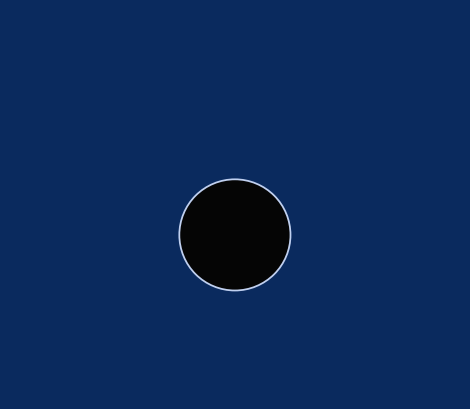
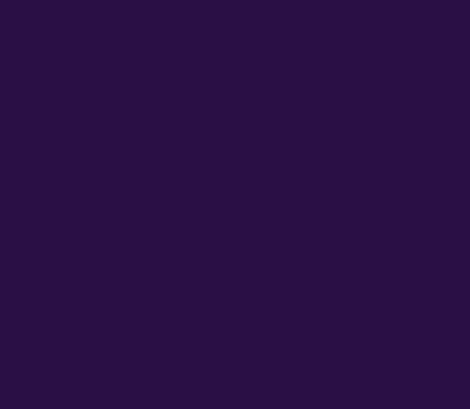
part: (234, 234) -> none

